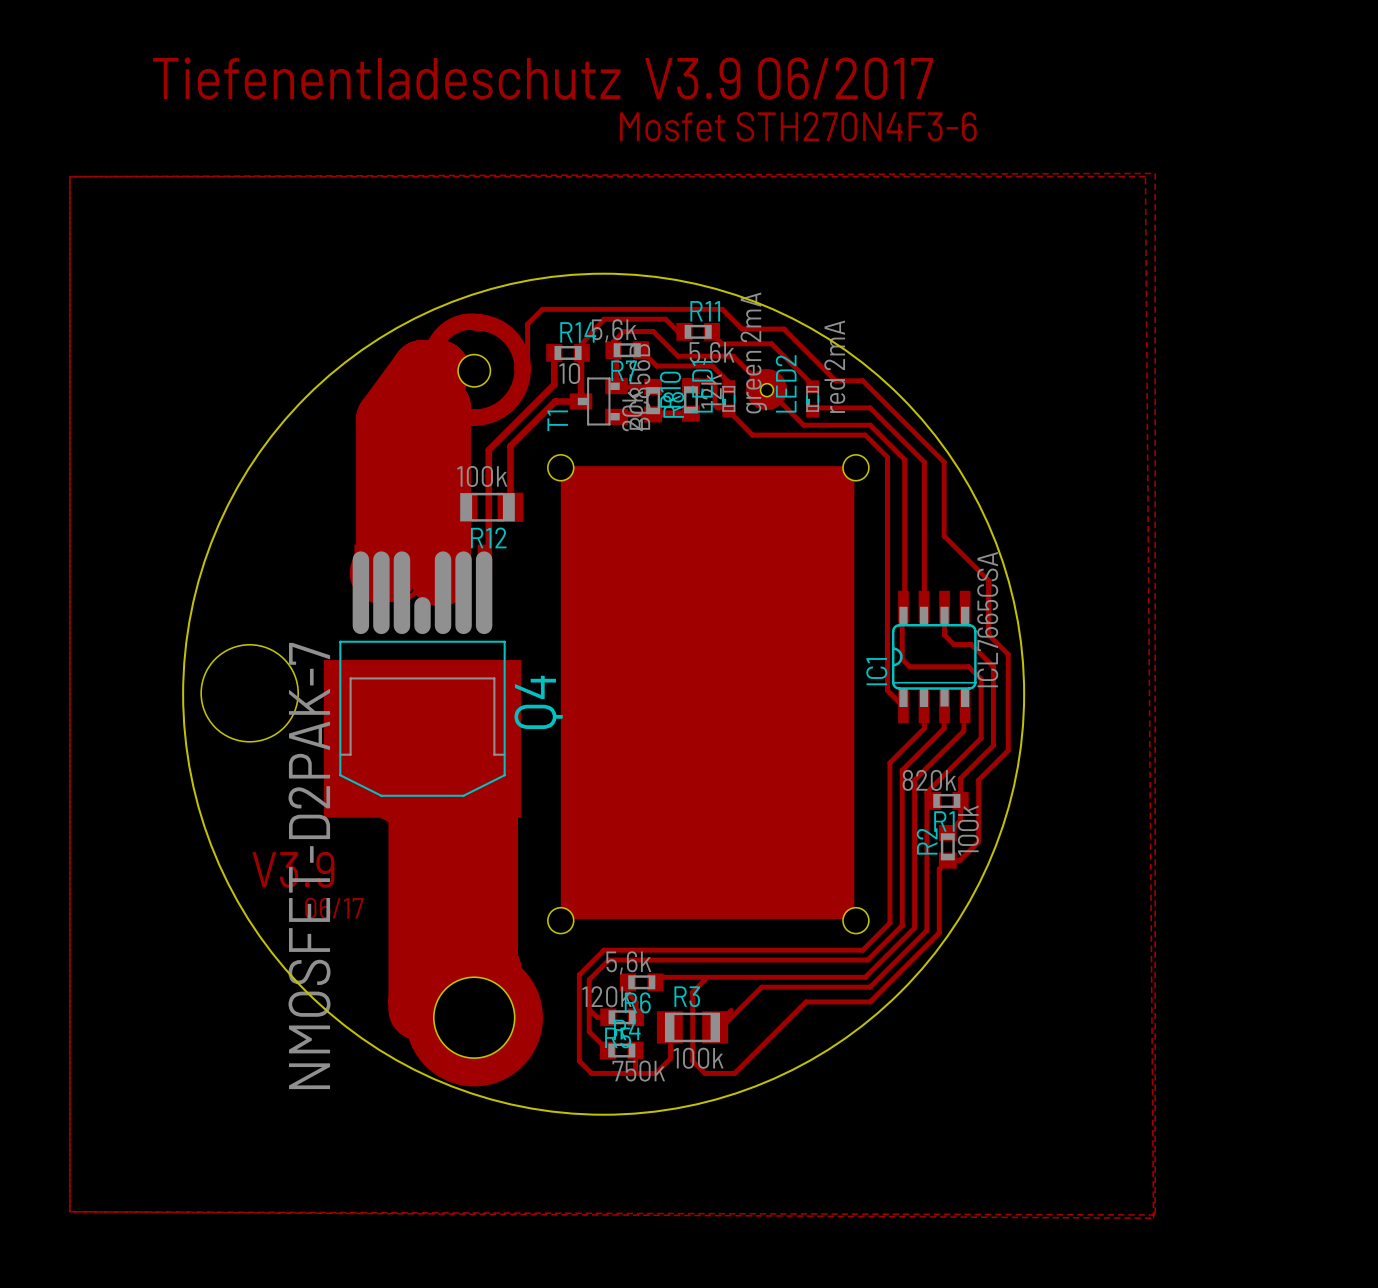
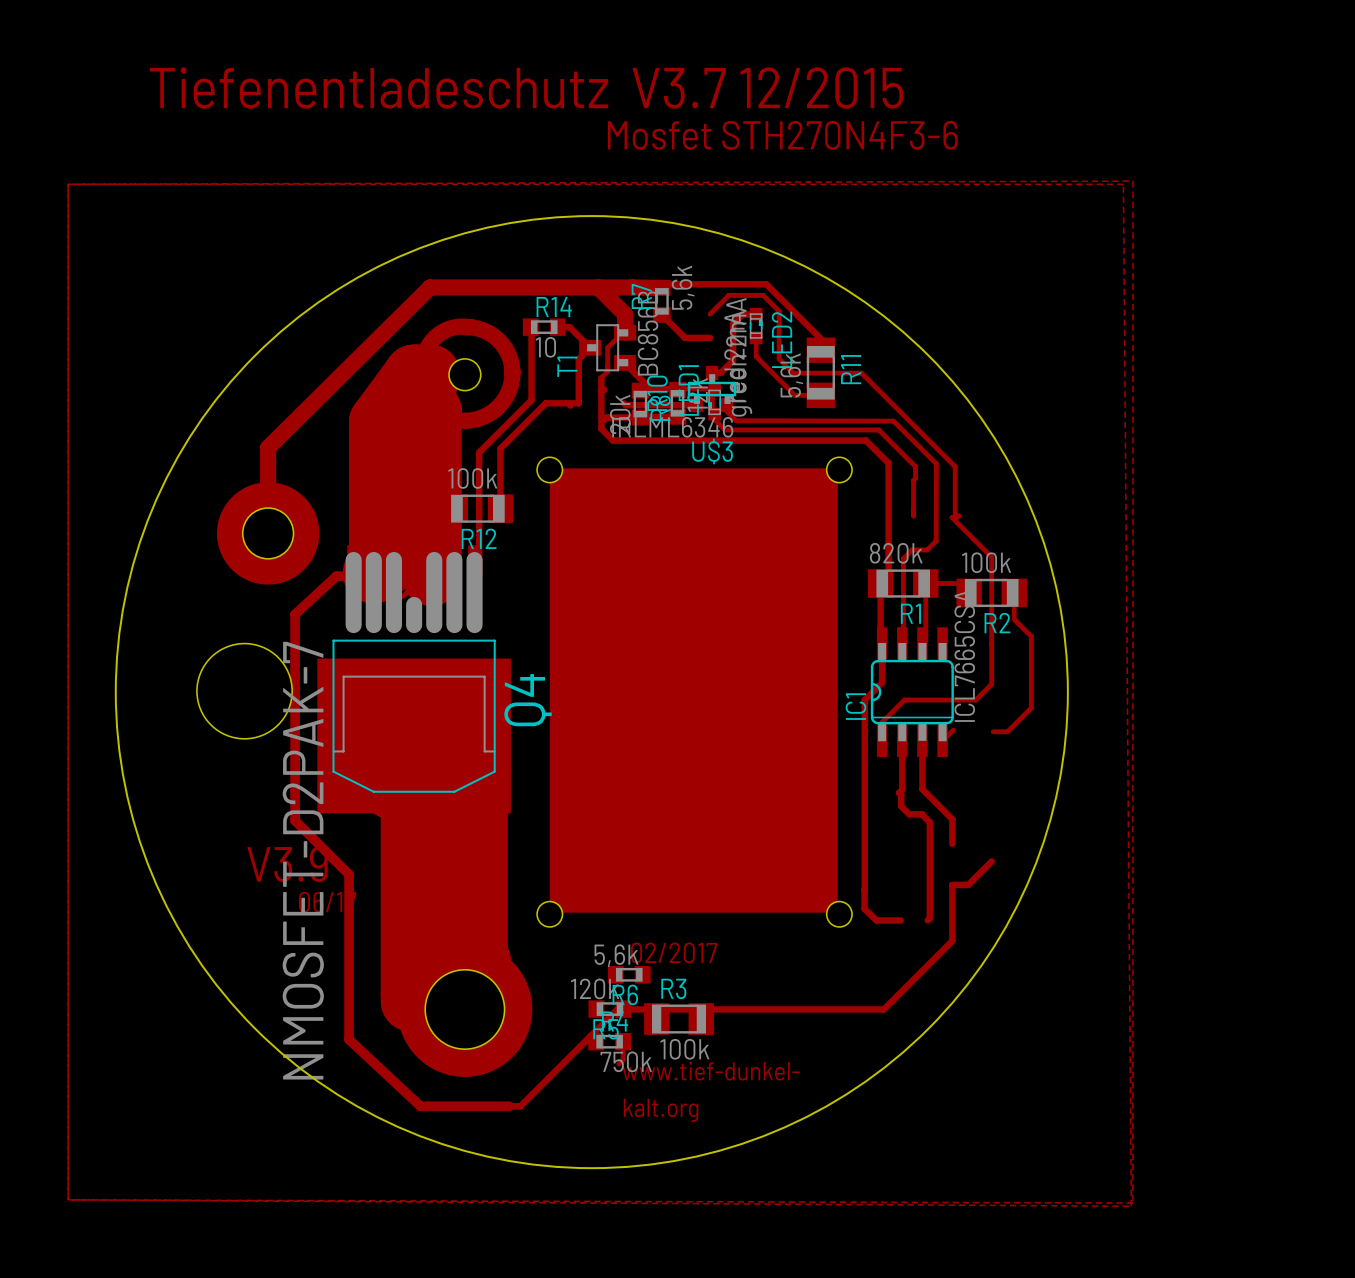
text: Tiefenentladeschutz V3.9 06/2017 (543, 78) -> Tiefenentladeschutz V3.7 12/2015 (526, 88)
round board edge size: [182, 272, 1026, 1116] -> [114, 215, 1069, 1170]
track: none -> (598, 287) (625, 314) (625, 332)
track: none -> (710, 314) (728, 295) (763, 295) (779, 311) (779, 358) (793, 373) (861, 373) (955, 466) (955, 518) (958, 515) (952, 517) (991, 557) (991, 684) (975, 700) (904, 700) (882, 722) (882, 740)
track: none -> (756, 314) (742, 314) (733, 323) (733, 360) (720, 372) (712, 372)
track: none -> (661, 314) (684, 337) (710, 337)
R11 name position: R11 (705, 311) -> R11 (851, 369)
R11 footprint: [676, 322, 721, 341] -> [806, 337, 836, 409]
track: none -> (622, 332) (607, 347) (607, 371) (601, 377) (601, 428) (613, 440) (865, 440) (888, 463) (888, 583) (880, 583) (882, 682) (864, 700) (864, 909) (876, 920) (900, 920)
track: (684, 331) (678, 331) (665, 319) (604, 319) (581, 343) (580, 401) (555, 401) -> (557, 327) (569, 327) (590, 347) (578, 359) (578, 403) (545, 403) (544, 404)
track: (711, 331) (721, 343) (771, 343) (812, 386) -> none
track: none -> (756, 337) (756, 356) (794, 395) (820, 395)
track: none -> (821, 349) (820, 338) (766, 284) (665, 284) (661, 287) (429, 287) (268, 447) (268, 533)
R7 rotation: 0° (627, 350) -> 90° clockwise (661, 301)
R7 position: (627, 350) -> (661, 301)
track: (640, 350) (656, 366) (712, 366) (727, 381) (728, 386) -> none
track: (554, 352) (554, 384) (542, 396) -> (531, 333) (531, 400)
R14 position: (568, 352) -> (544, 327)
R11 value position: 5,6k (712, 353) -> 5,6k (791, 375)
track: none -> (625, 362) (650, 389) (712, 389) (712, 417) (724, 429) (878, 429) (915, 466) (913, 515)
track: (522, 367) (527, 362) (527, 324) (542, 309) (722, 309) (742, 329) (783, 329) (835, 380) (862, 380) (944, 462) (944, 536) (988, 580) (988, 634) (1008, 654) (1008, 750) (978, 780) (978, 841) (959, 860) (947, 860) (939, 869) (939, 932) (870, 1001) (806, 1001) (734, 1073) (705, 1073) (692, 1061) (692, 992) (705, 979) (705, 977) -> none
U$3: none -> IRLML6346 (712, 389)
track: (652, 386) (616, 386) (616, 353) (613, 350) (613, 341) (623, 331) (653, 331) (677, 356) (733, 356) (803, 425) (870, 425) (904, 459) (904, 605) (902, 608) (902, 659) (909, 666) (968, 666) (981, 679) (981, 738) (926, 792) (926, 930) (870, 987) (761, 987) (721, 1027) (715, 1027) (731, 1010) -> none
track: (690, 386) (696, 380) (707, 380) (714, 385) (714, 405) (717, 407) (725, 407) (752, 435) (865, 435) (887, 457) (887, 690) (903, 706) -> none
part: (766, 389) -> none
hole: (766, 390) -> none
LED2 rotation: 0° (812, 398) -> 180° (756, 326)
LED2 position: (812, 398) -> (756, 326)
track: none -> (623, 403) (625, 405) (696, 405)
T1 position: (598, 401) -> (607, 347)
track: none -> (727, 405) (727, 411) (736, 420) (893, 421) (936, 463) (936, 541) (927, 549) (912, 549) (903, 558) (902, 643)
track: (811, 408) (870, 407) (924, 462) (924, 607) -> none
hole: none -> (268, 533)
part: none -> (268, 533)
track: none -> (371, 576) (336, 576) (295, 614) (295, 820) (349, 874) (349, 1039) (420, 1106) (520, 1106) (617, 1009) (883, 1009) (952, 940) (952, 884) (968, 884) (991, 861)
track: none -> (969, 592) (959, 583) (925, 583) (925, 640) (922, 643)
track: none -> (1014, 592) (1014, 619) (1031, 636) (1031, 707) (1007, 731) (993, 731)
track: (944, 606) (944, 635) (954, 644) (971, 644) (993, 666) (993, 745) (960, 778) (960, 820) (947, 833) -> none
IC1 position: (934, 656) -> (912, 692)
track: (924, 706) (924, 728) (889, 762) (889, 923) (862, 950) (604, 950) (579, 974) (579, 1061) (591, 1073) (655, 1073) (670, 1058) (669, 1027) -> none
track: (944, 706) (944, 728) (902, 770) (902, 925) (867, 960) (608, 960) (589, 979) (589, 1031) (608, 1050) -> none
track: (965, 706) (963, 730) (914, 780) (914, 928) (865, 977) (661, 977) (655, 982) -> none
track: none -> (953, 730) (942, 740)
track: none -> (902, 740) (902, 789) (899, 792) (901, 795) (901, 806) (909, 814) (921, 814) (929, 822) (929, 918) (927, 920)
track: none -> (922, 740) (922, 789) (952, 819) (952, 843)
R1 footprint: [924, 792, 969, 810] -> [867, 569, 939, 598]
R2 footprint: [938, 824, 957, 869] -> [956, 578, 1027, 608]
R2 value position: 100k (968, 830) -> 100k (986, 562)
R2 name position: R2 (927, 841) -> R2 (997, 623)
text: none -> 02/2017 (674, 952)
track: (628, 982) (628, 993) (636, 1001) (636, 1017) -> none
track: (589, 1009) (597, 1017) (608, 1017) -> none
text: none -> www.tief-dunkel- (711, 1071)
text: none -> kalt.org (661, 1110)

